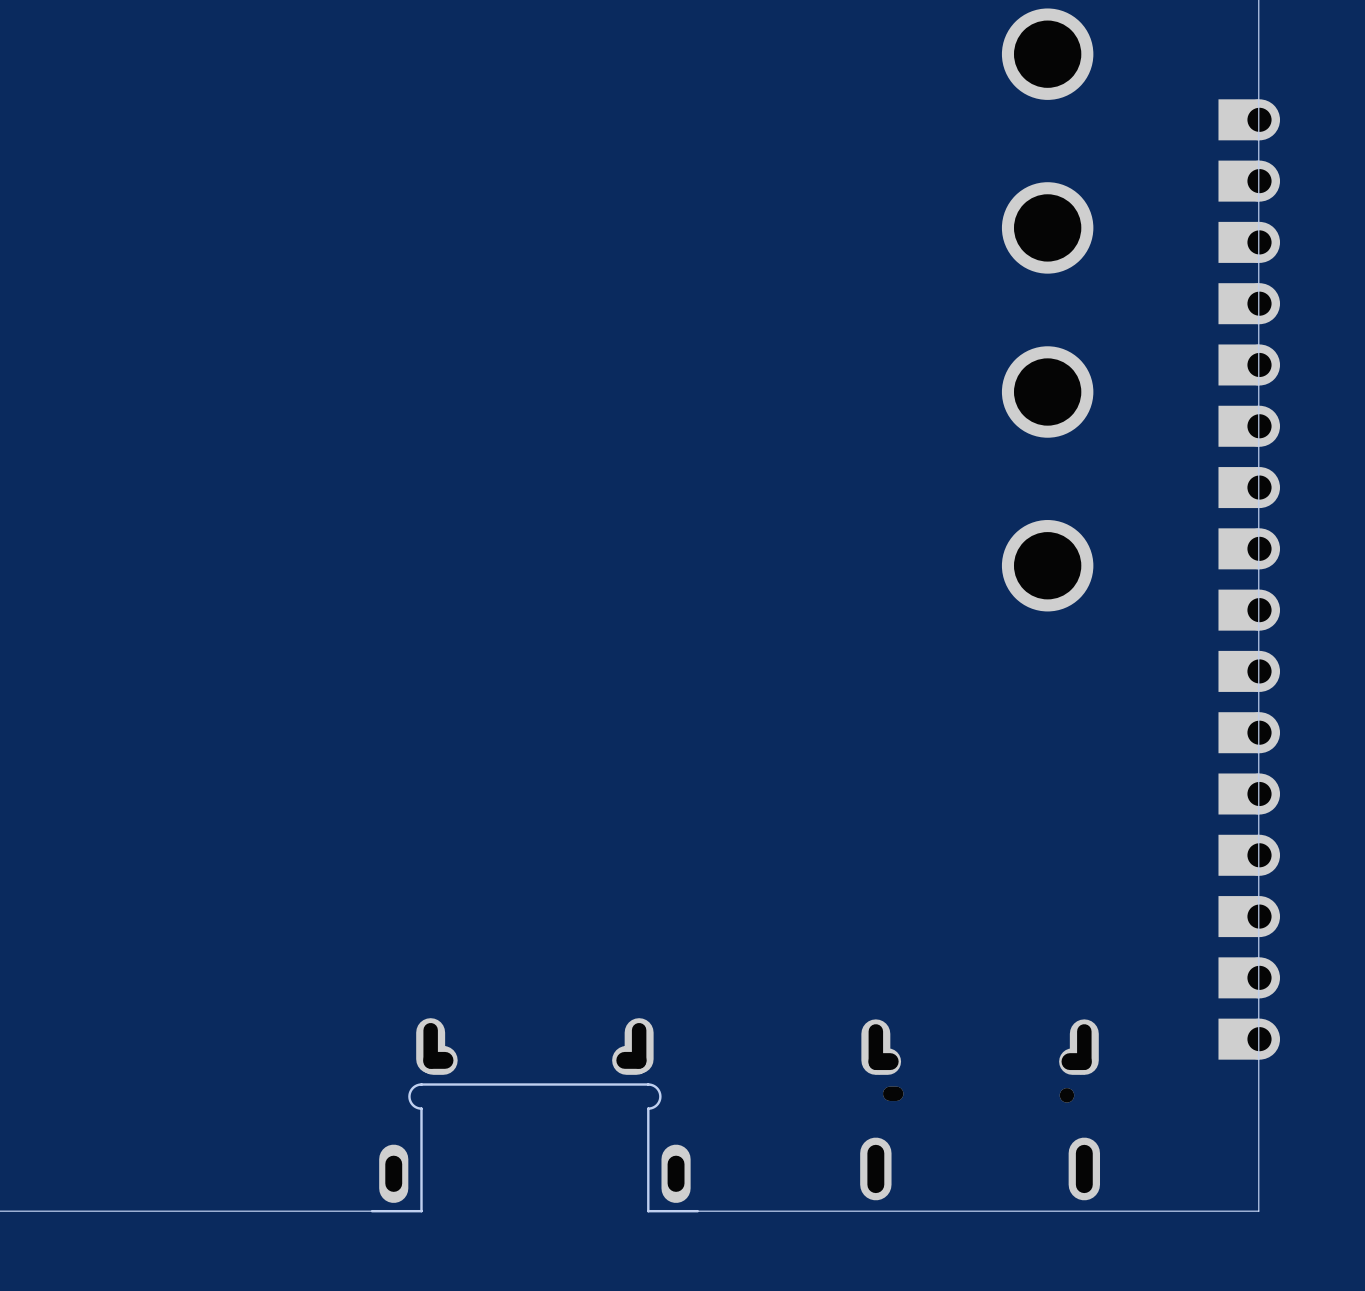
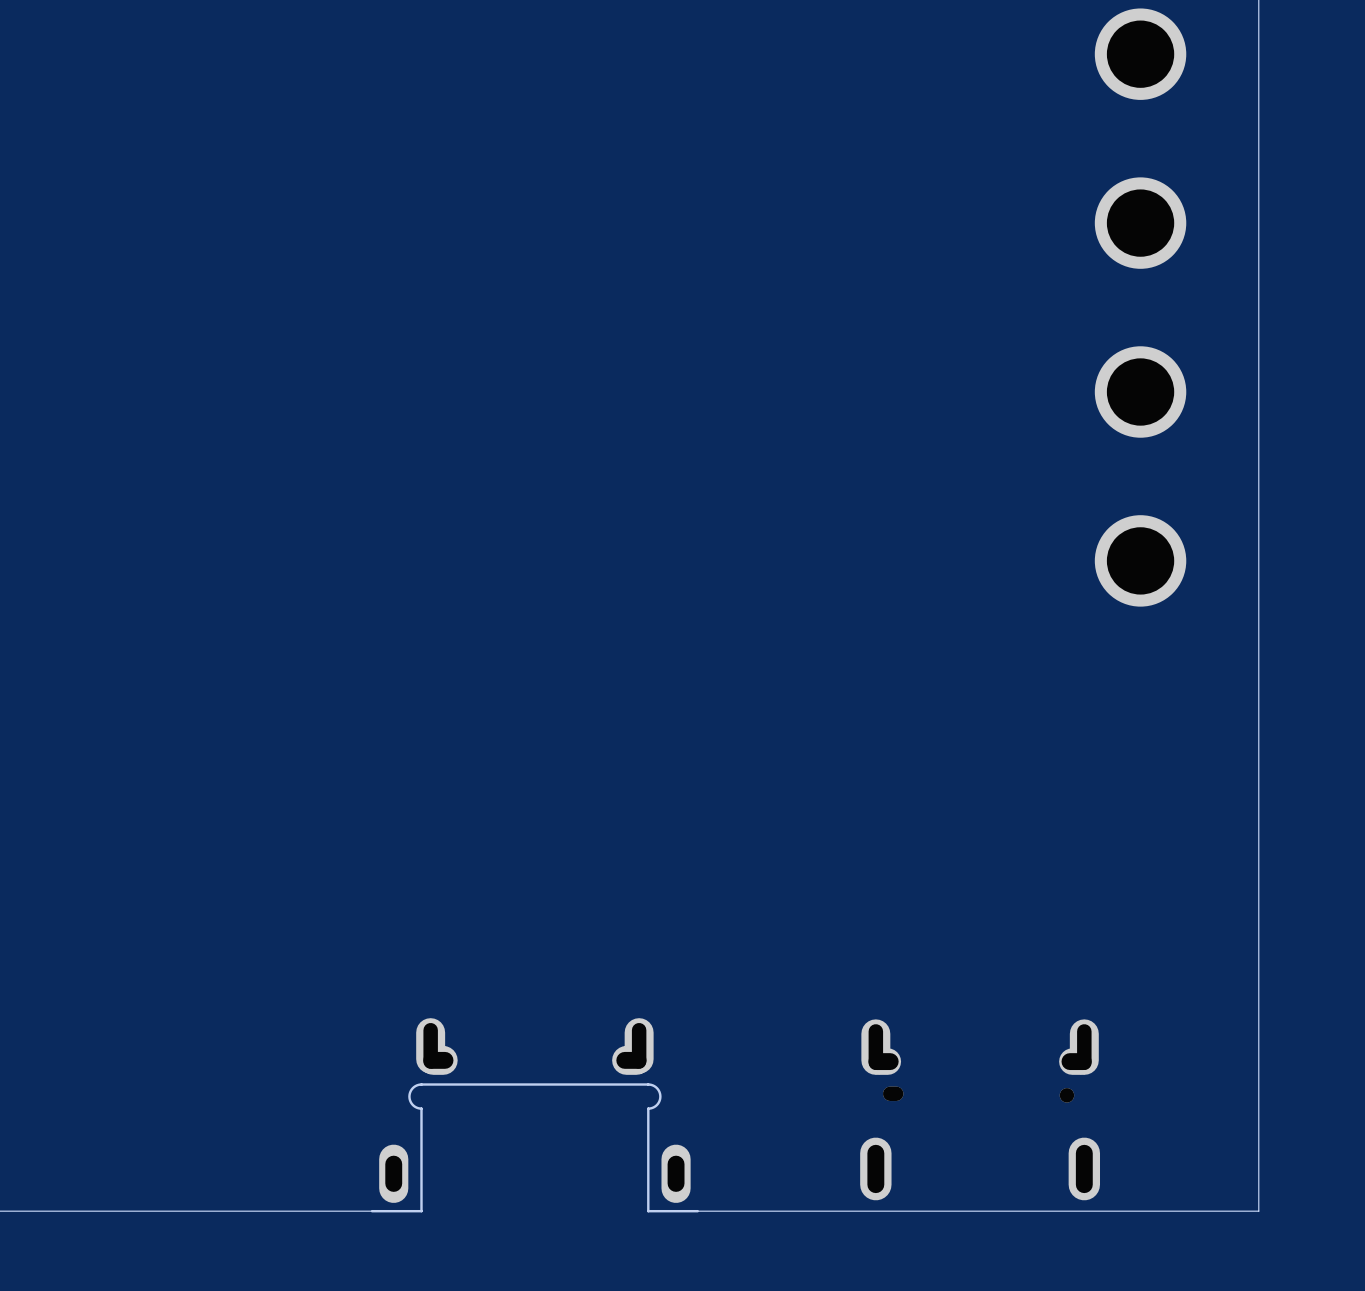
part position: (1047, 54) -> (1140, 54)
part: (1249, 211) -> none
part position: (1047, 227) -> (1140, 223)
part position: (1047, 392) -> (1140, 392)
part: (1249, 456) -> none
part position: (1047, 565) -> (1140, 560)
part: (1249, 702) -> none
part: (1249, 947) -> none

